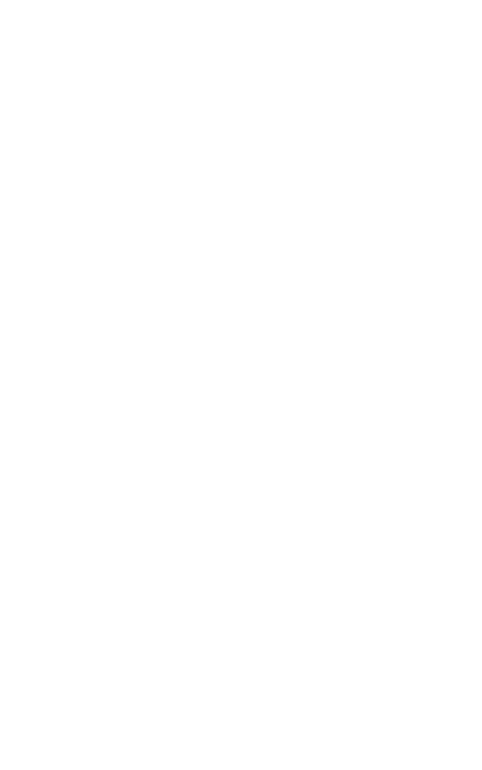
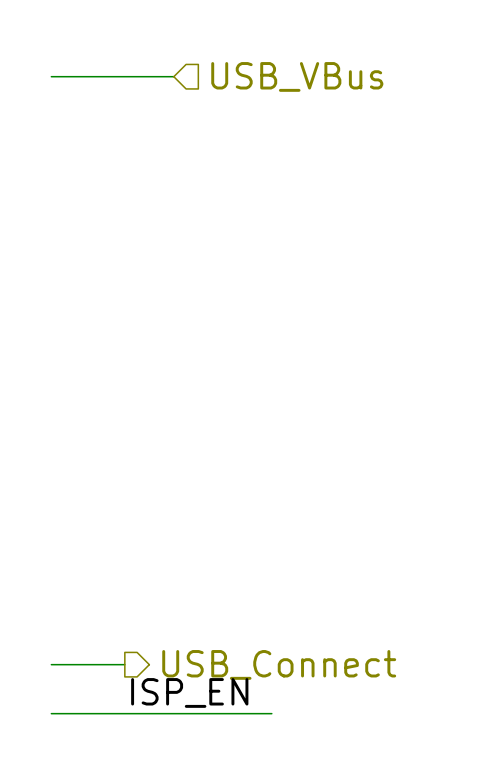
wire: none -> (51, 76) (173, 76)
hierarchical label: none -> USB_VBus (297, 76)
wire: none -> (51, 664) (124, 664)
hierarchical label: none -> USB_Connect (279, 664)
label: none -> ISP_EN (189, 692)
wire: none -> (51, 713) (271, 713)

